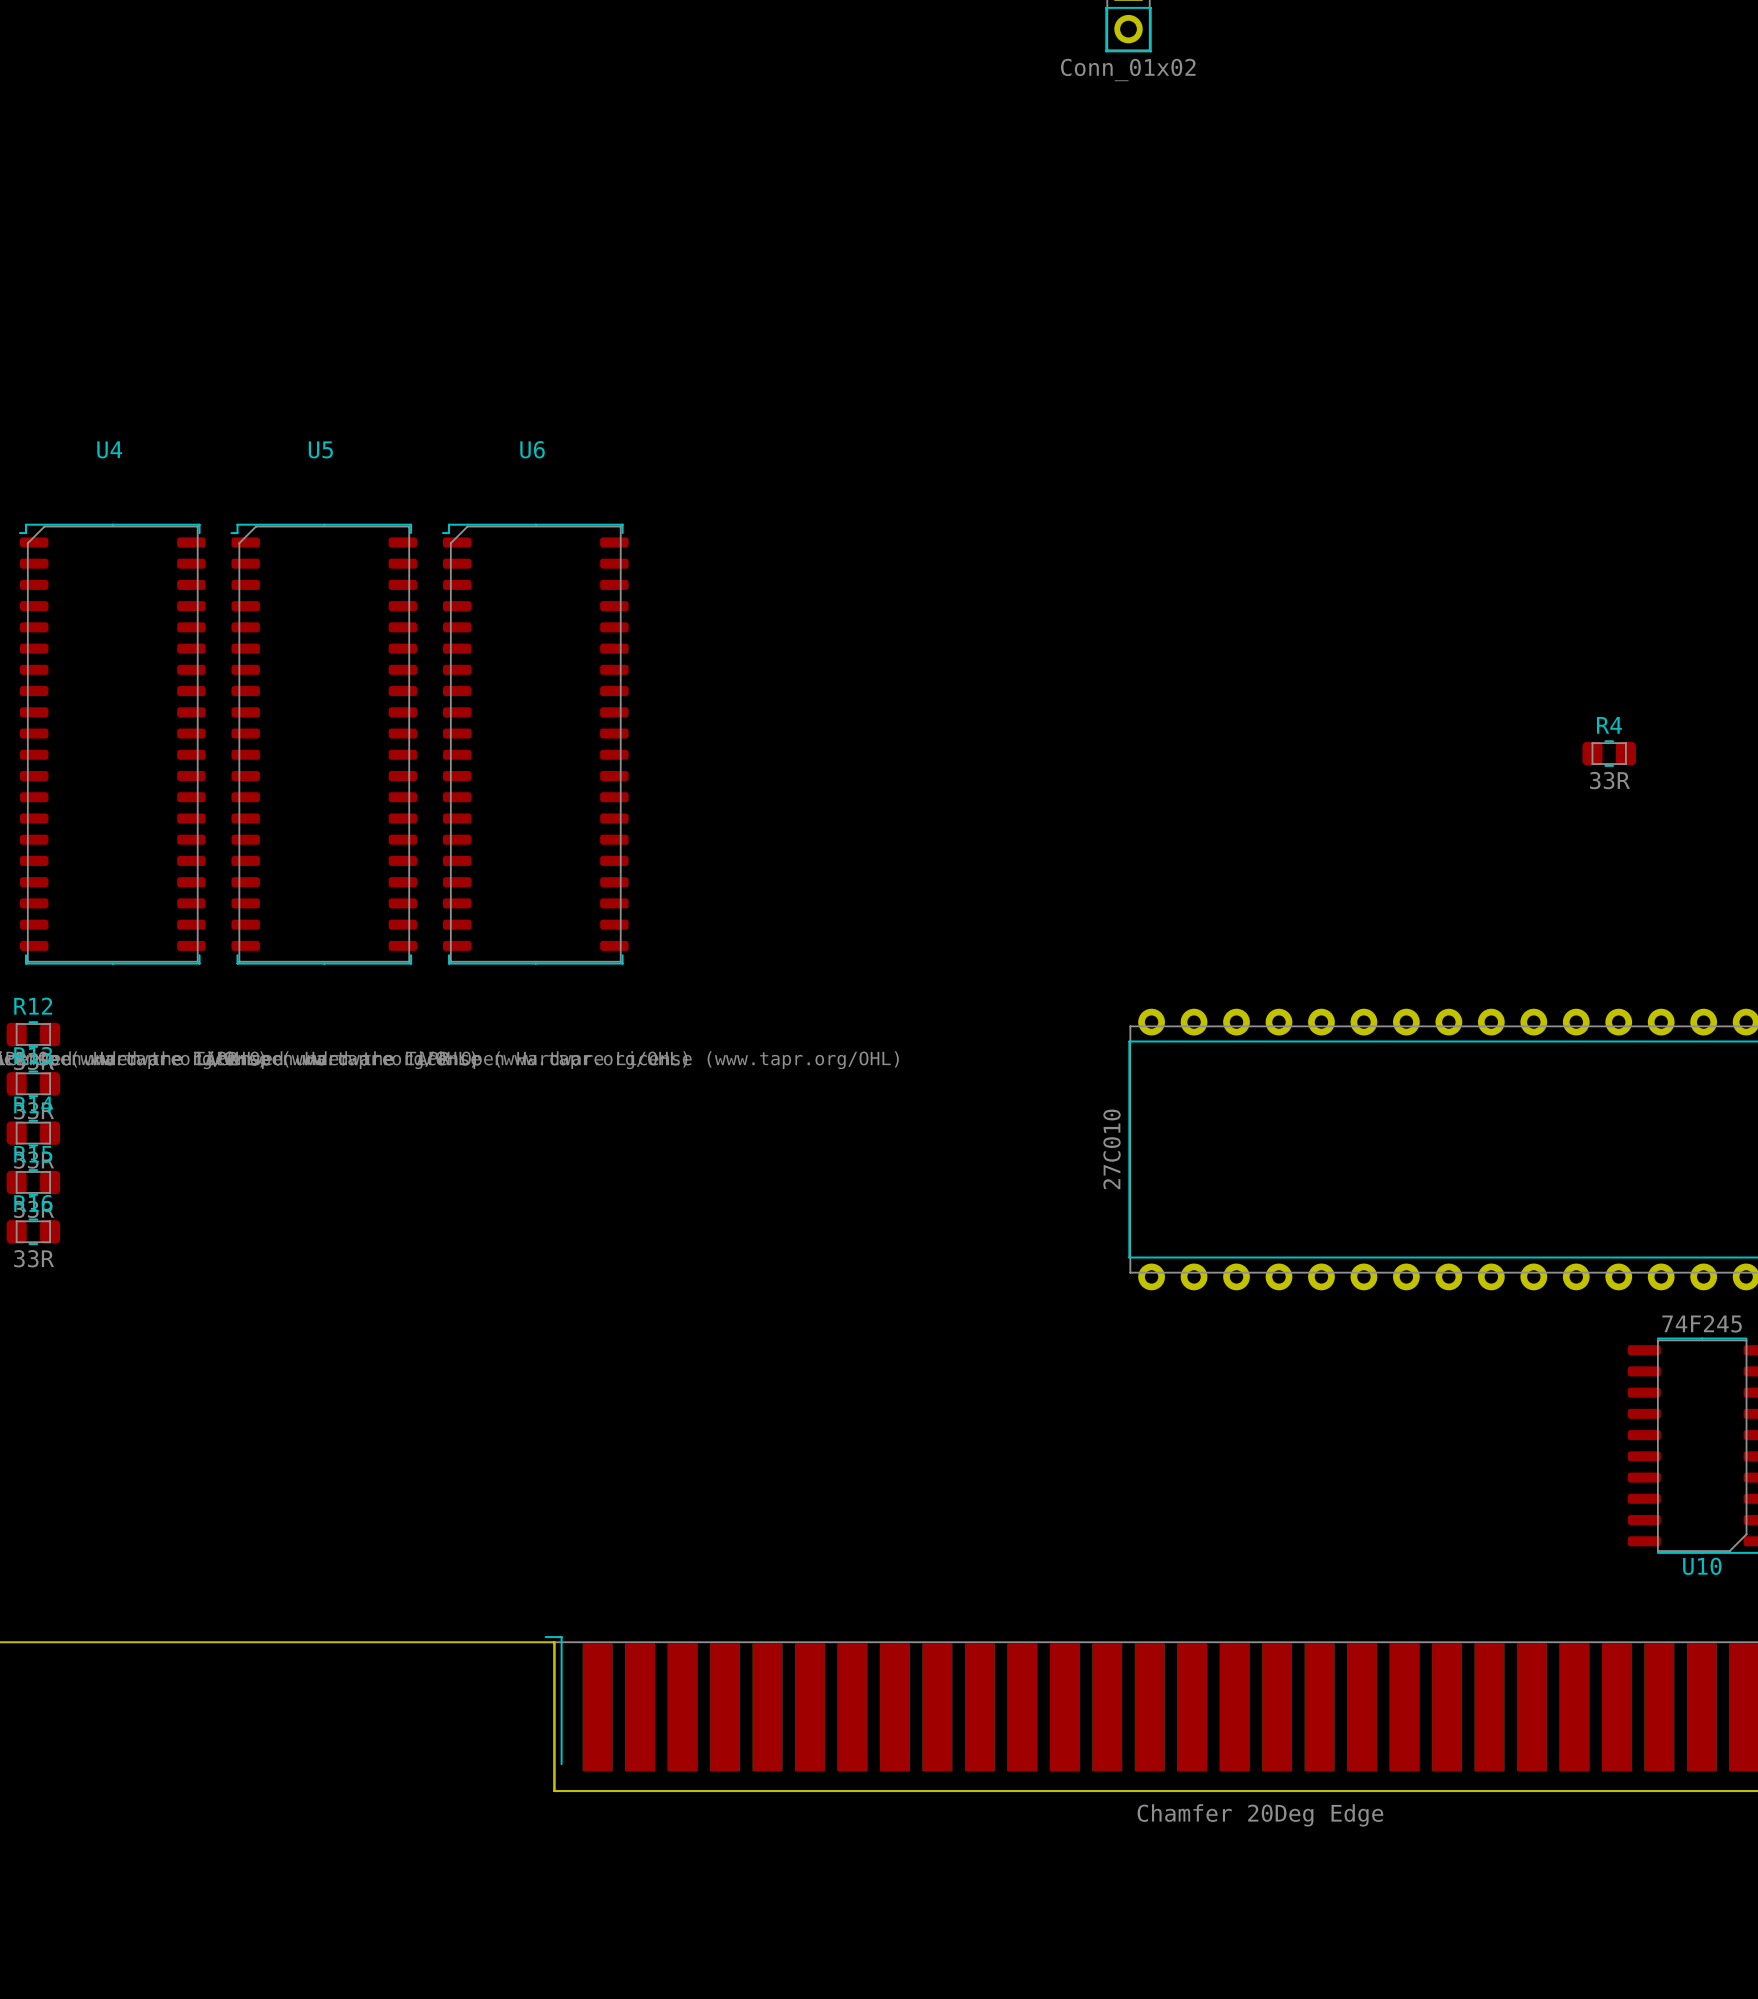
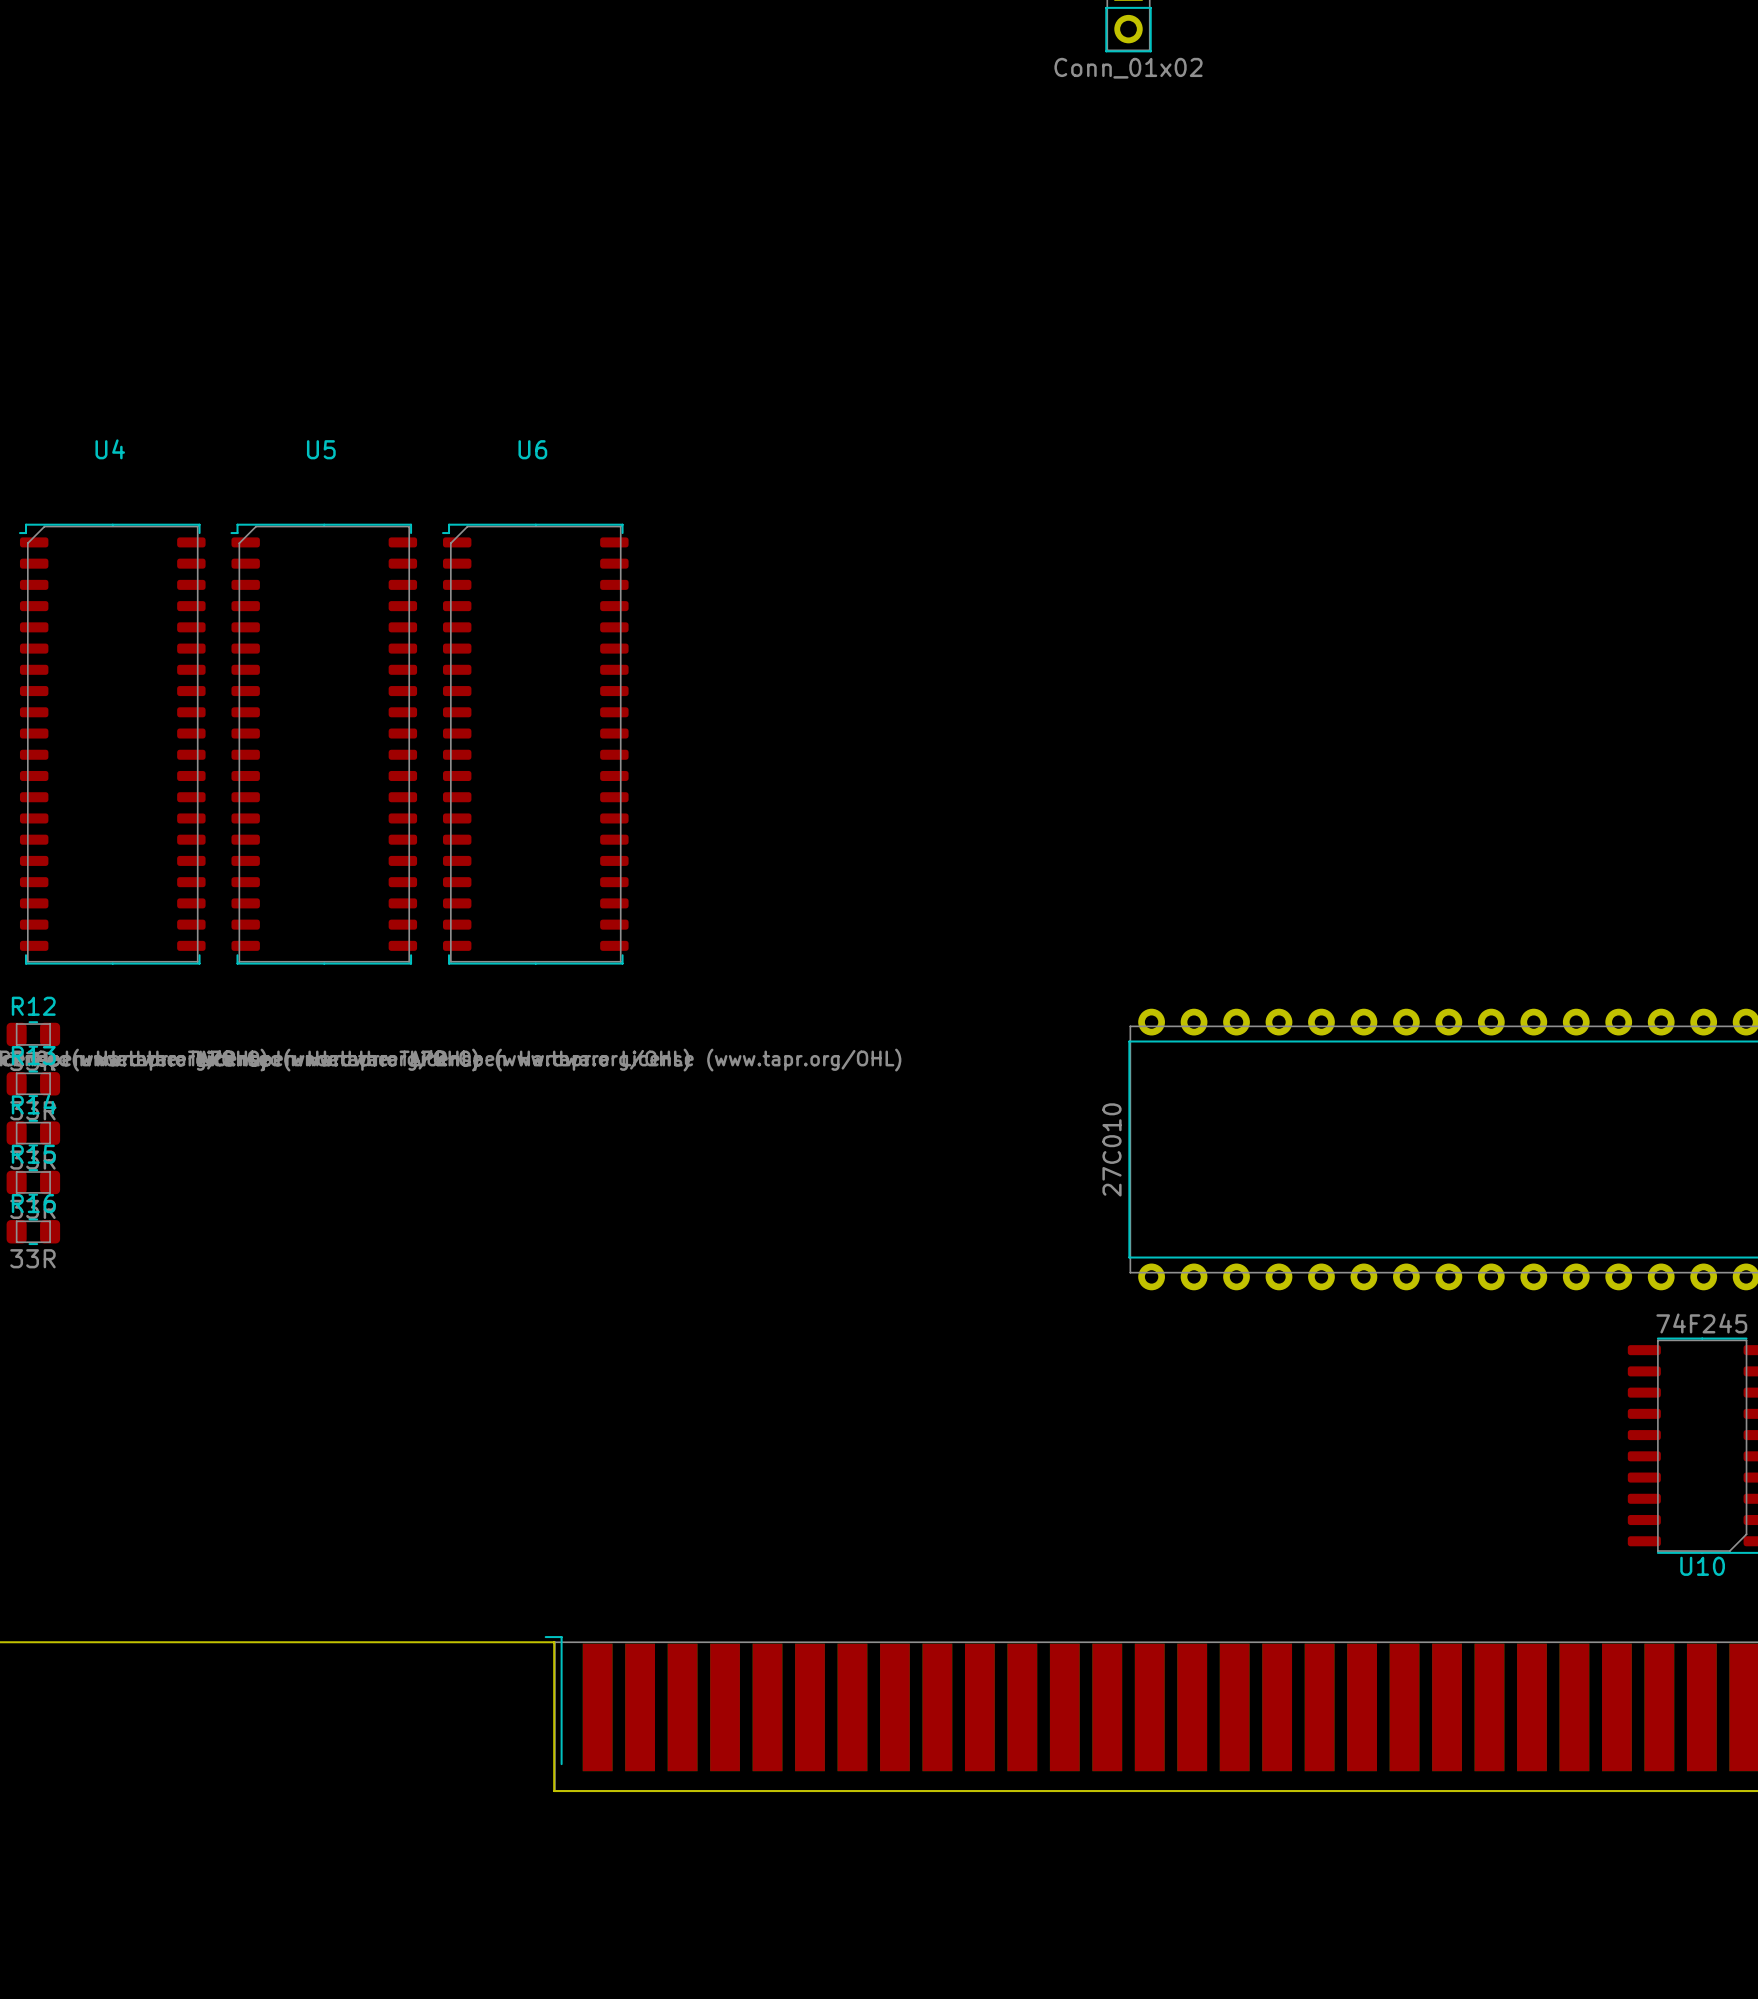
R4: 33R (1609, 753) -> none
text: Chamfer 20Deg Edge (1260, 1815) -> none

